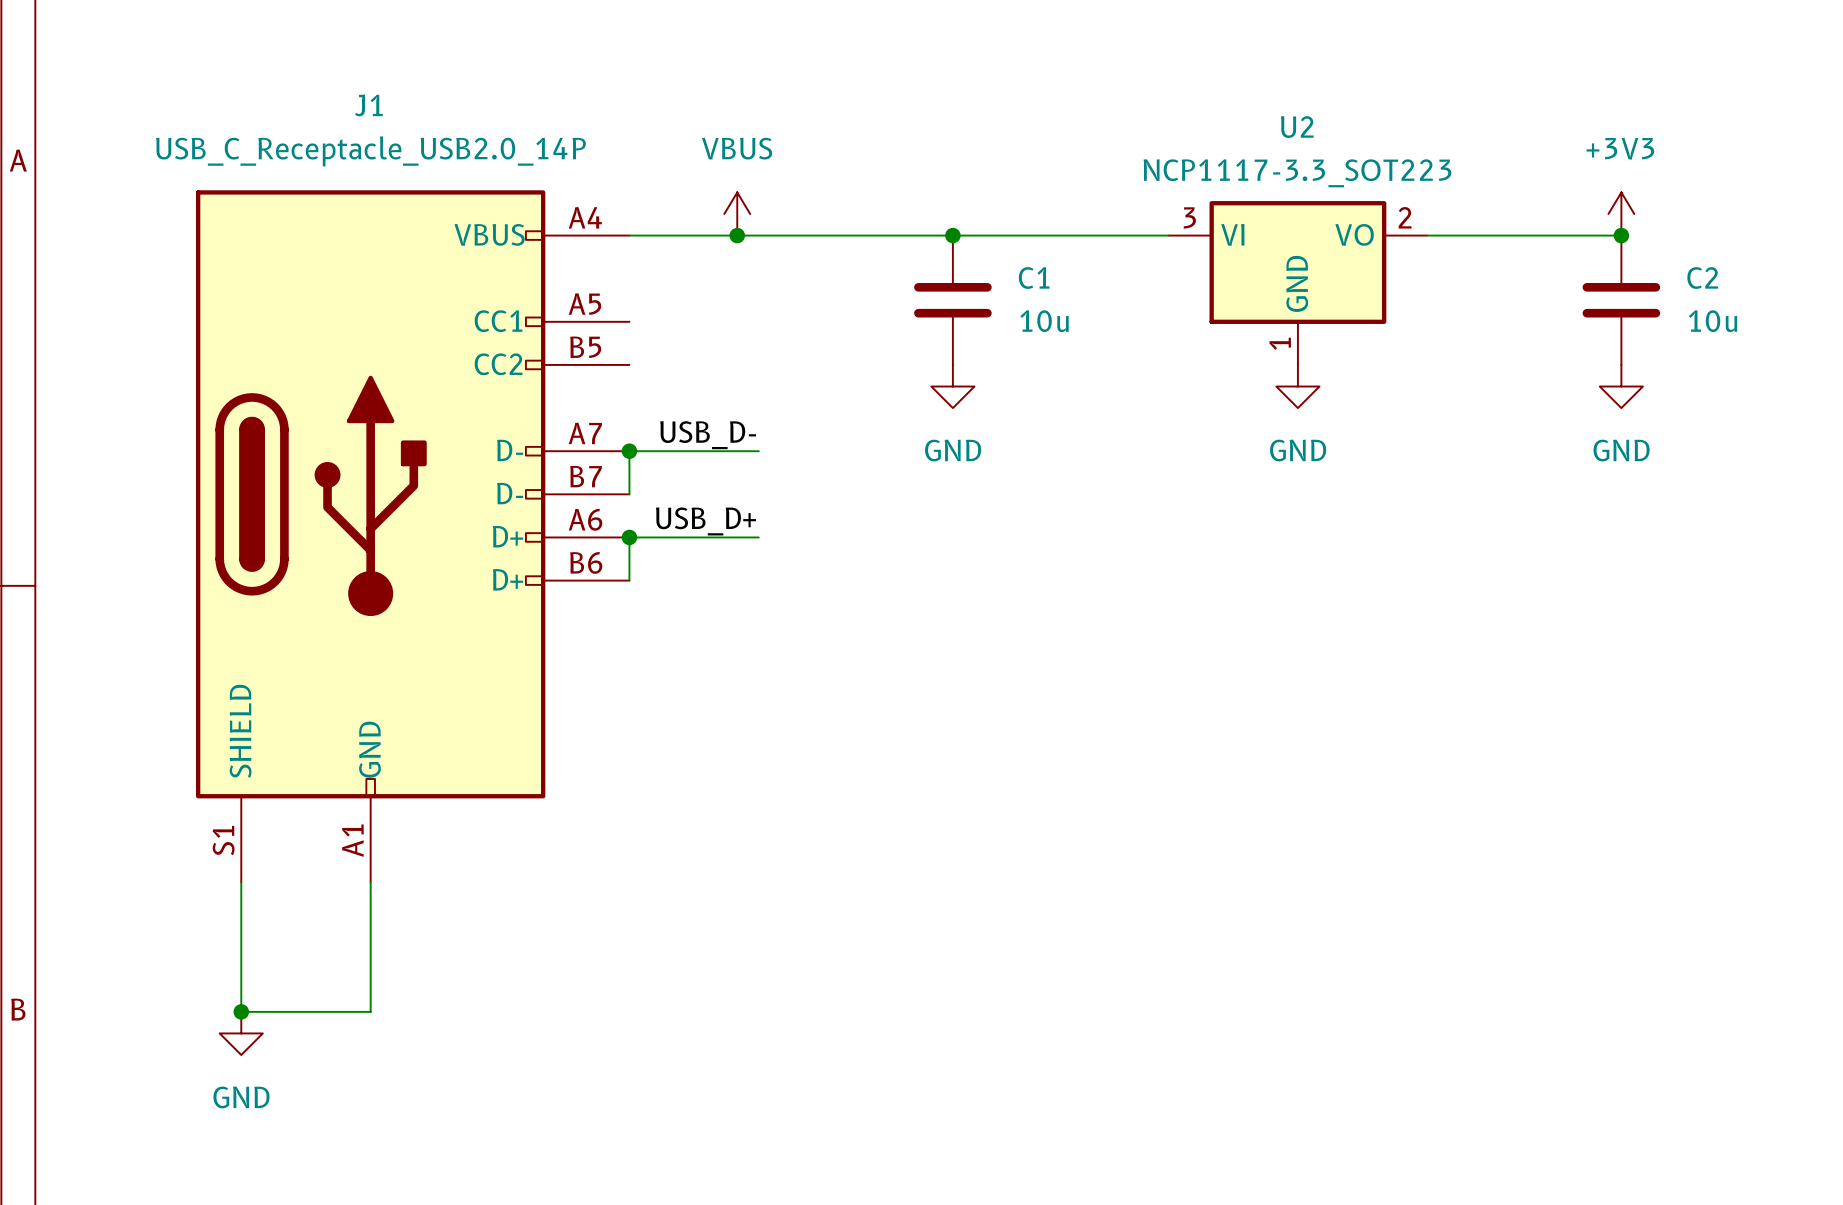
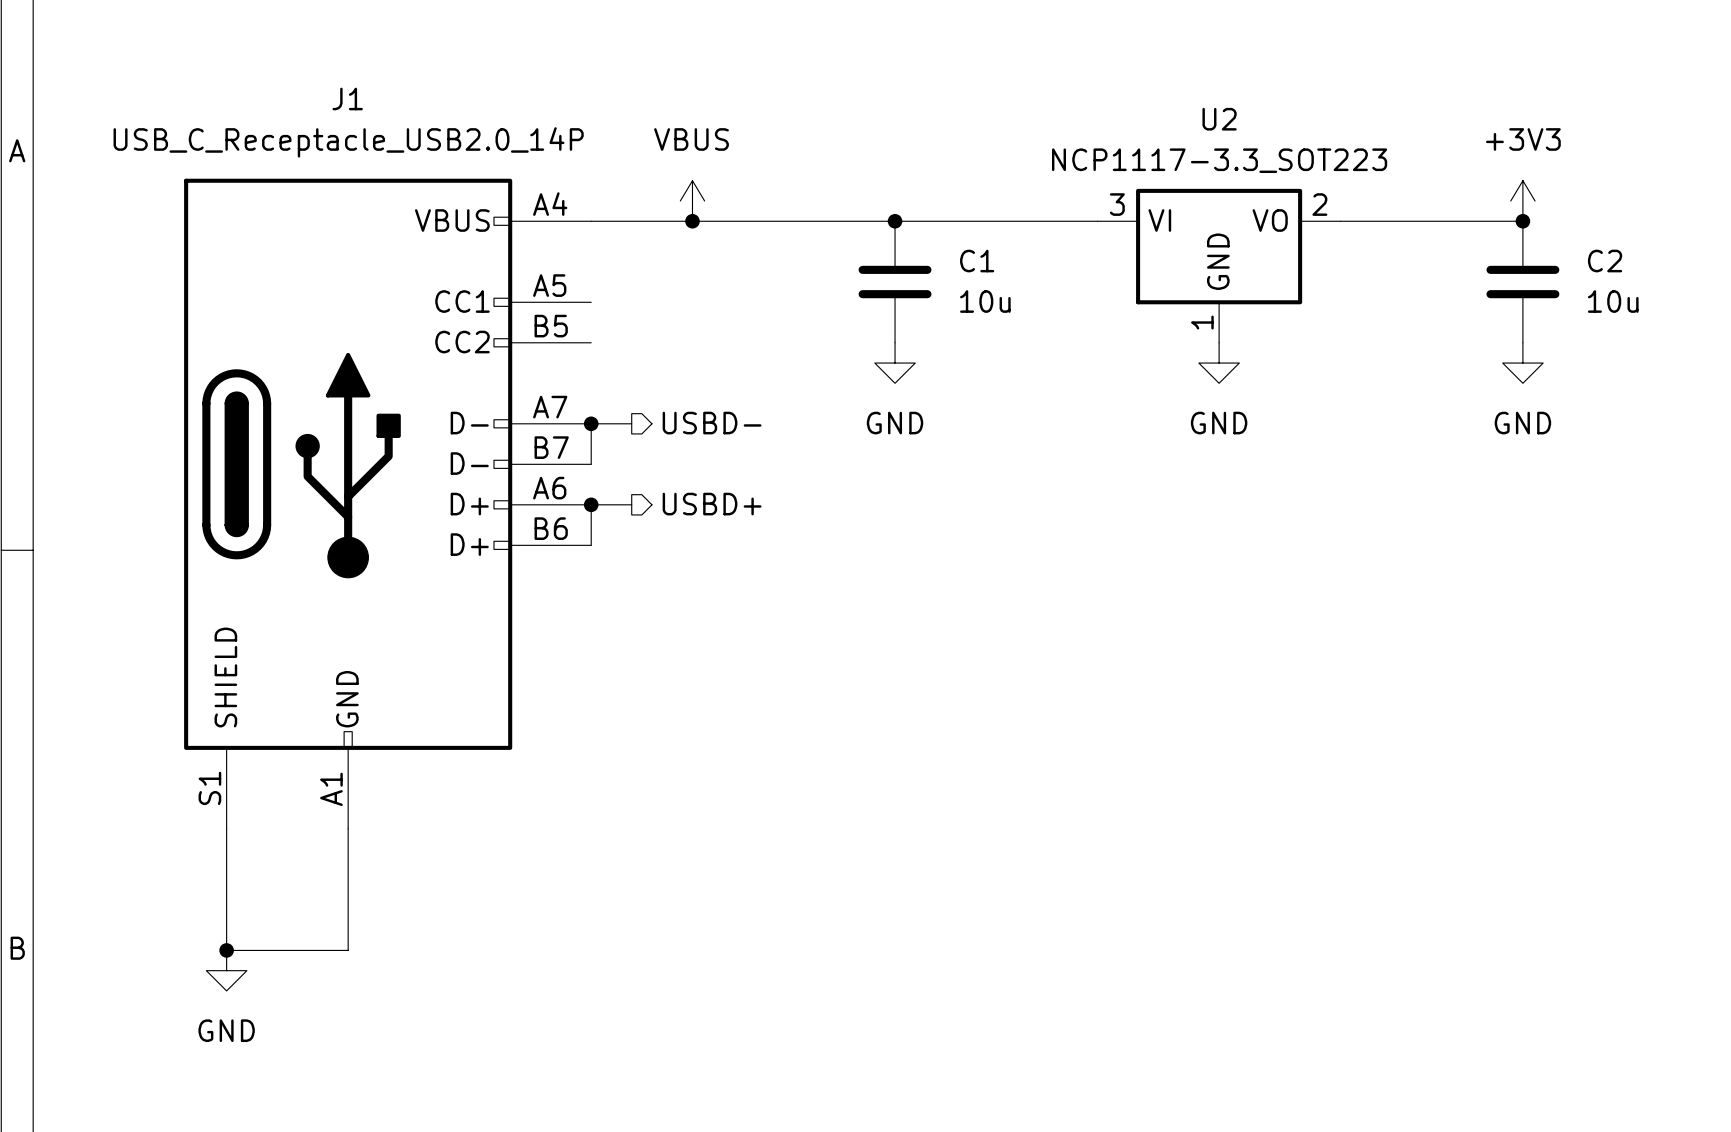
label: USB_D- (708, 435) -> none
hierarchical label: none -> USBD- (712, 423)
wire: (672, 451) (758, 451) -> none
label: USB_D+ (705, 521) -> none
hierarchical label: none -> USBD+ (712, 504)
wire: (672, 537) (758, 537) -> none

